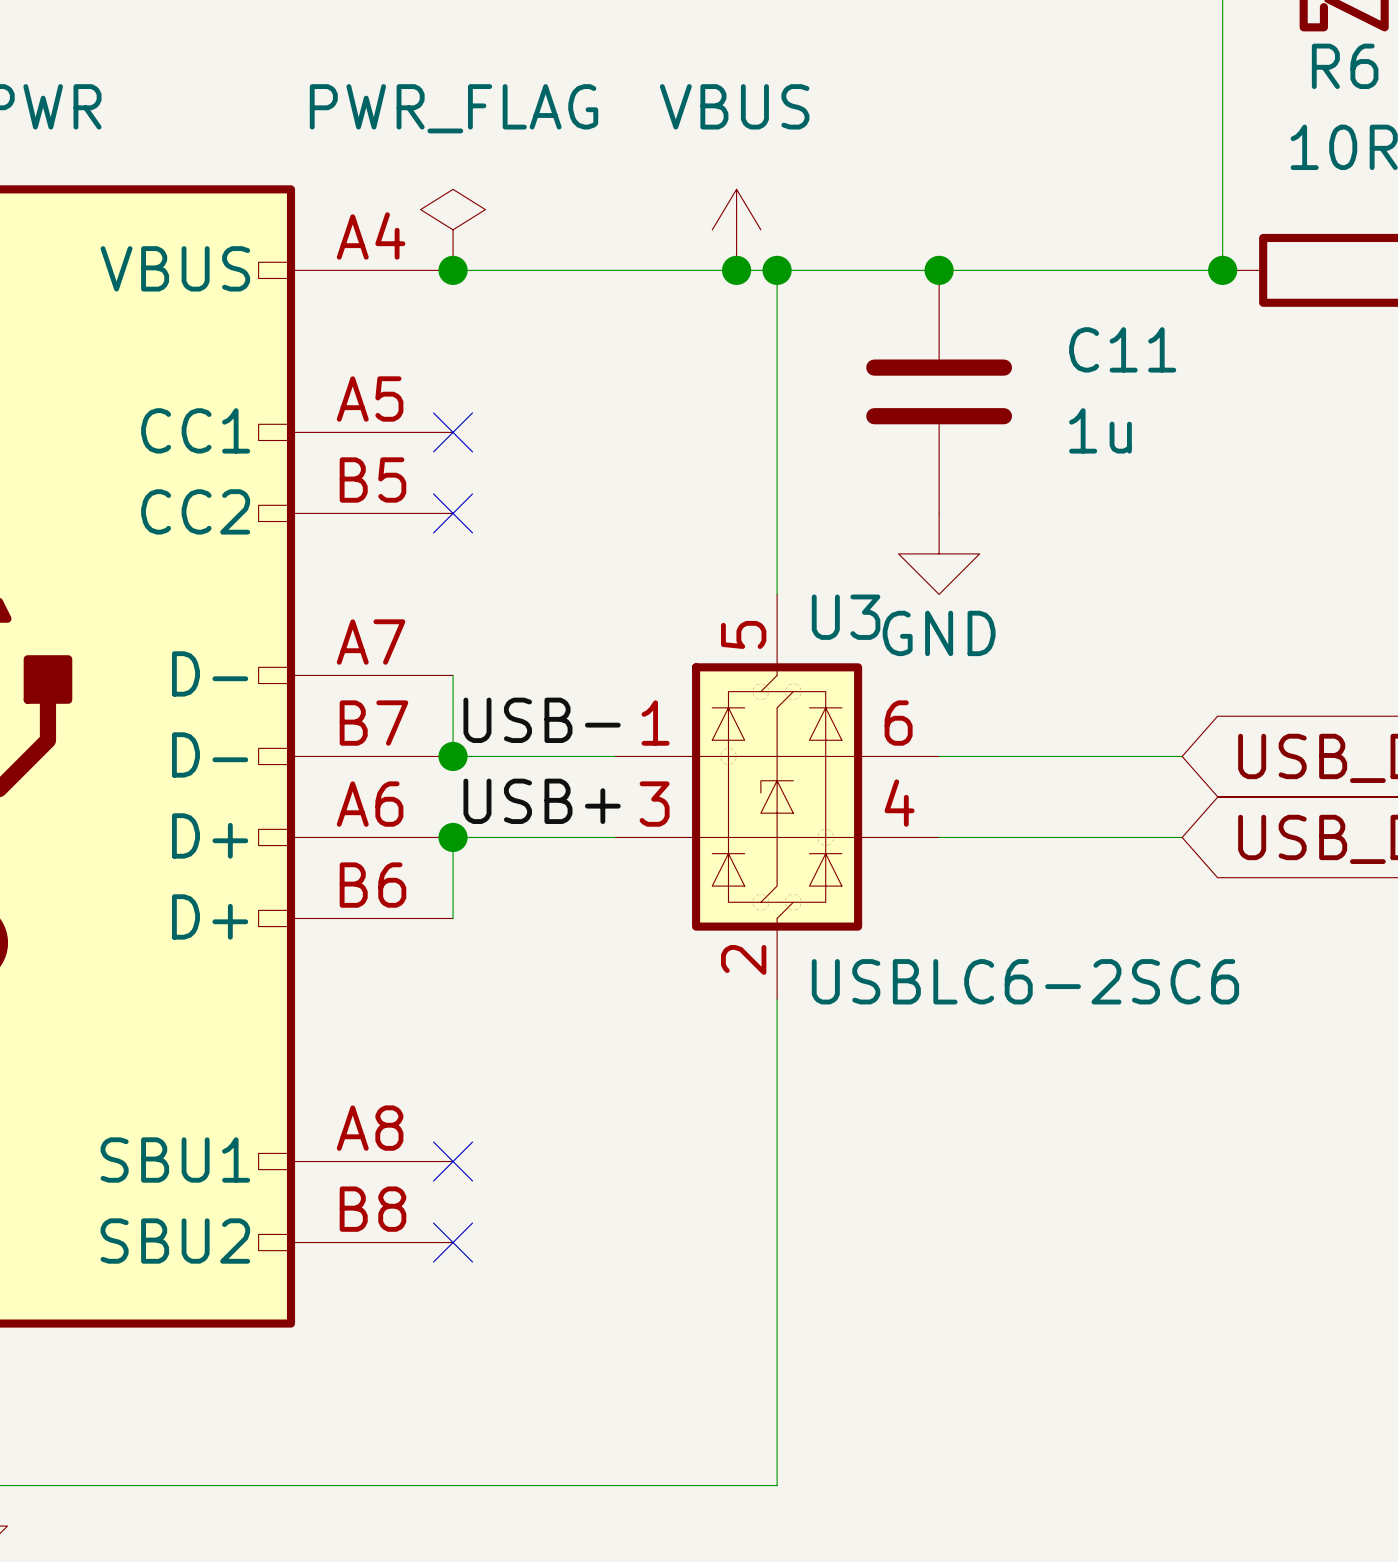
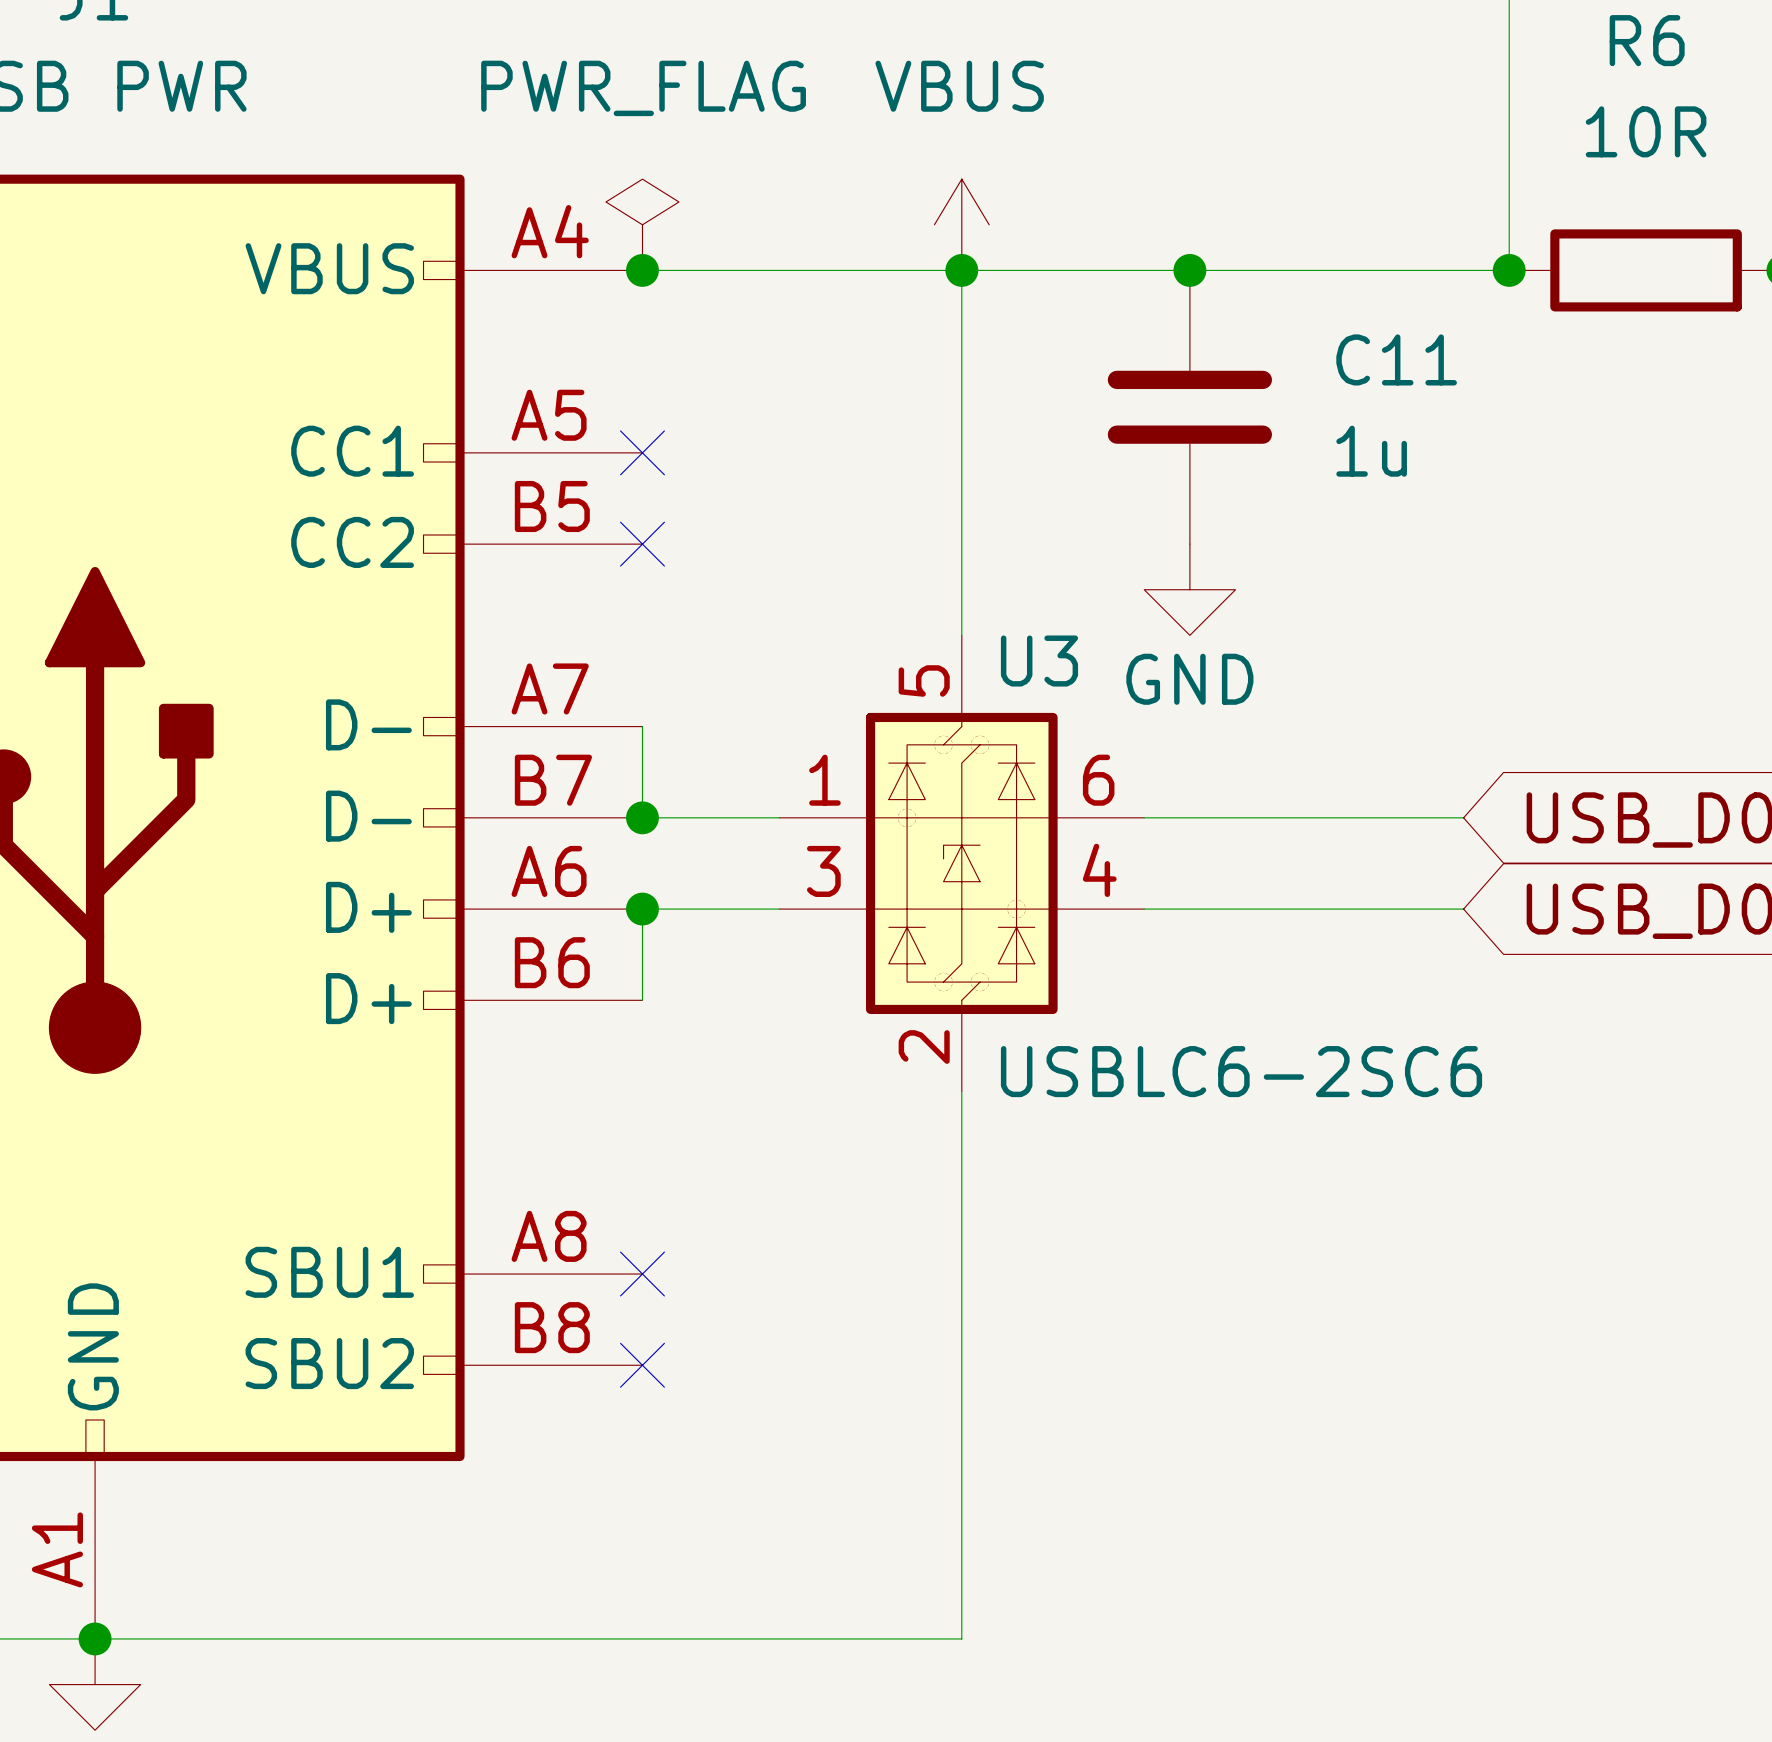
wire: (777, 270) (777, 594) -> (961, 270) (961, 635)
junction: (777, 270) -> none
label: USB- (542, 720) -> none
U3 position: (777, 796) -> (961, 863)
label: USB+ (542, 801) -> none
wire: (777, 999) (777, 1485) (736, 1485) -> (961, 1091) (961, 1638)

